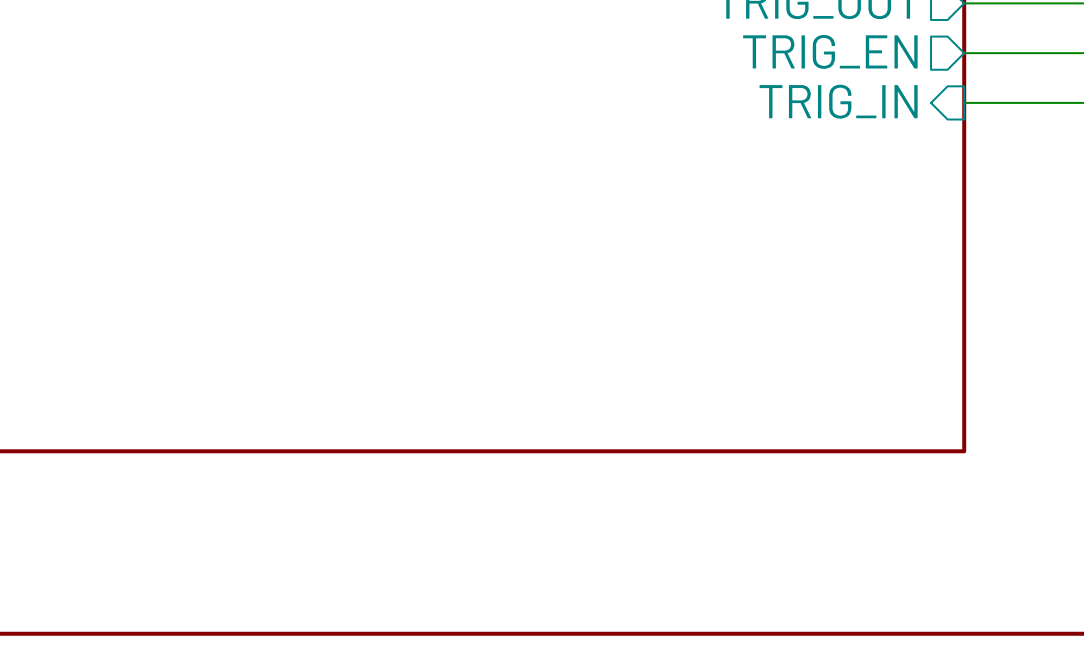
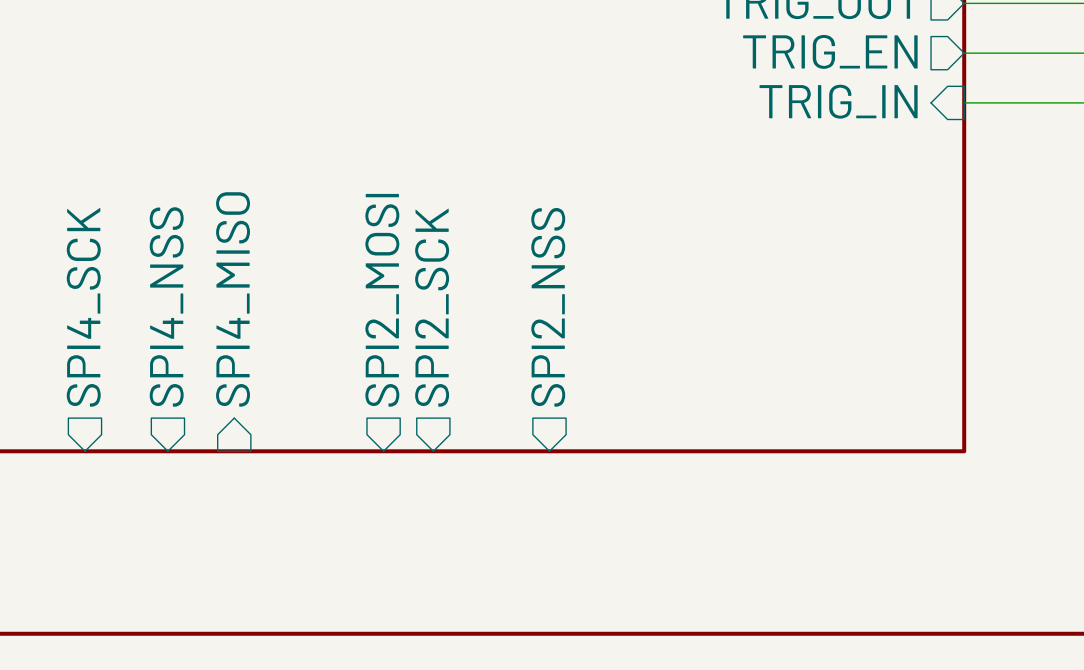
sheet pin: none -> SPI4_MISO (233, 299)
sheet pin: none -> SPI2_MOSI (382, 300)
sheet pin: none -> SPI4_NSS (166, 306)
sheet pin: none -> SPI4_SCK (83, 307)
sheet pin: none -> SPI2_SCK (432, 307)
sheet pin: none -> SPI2_NSS (548, 307)

